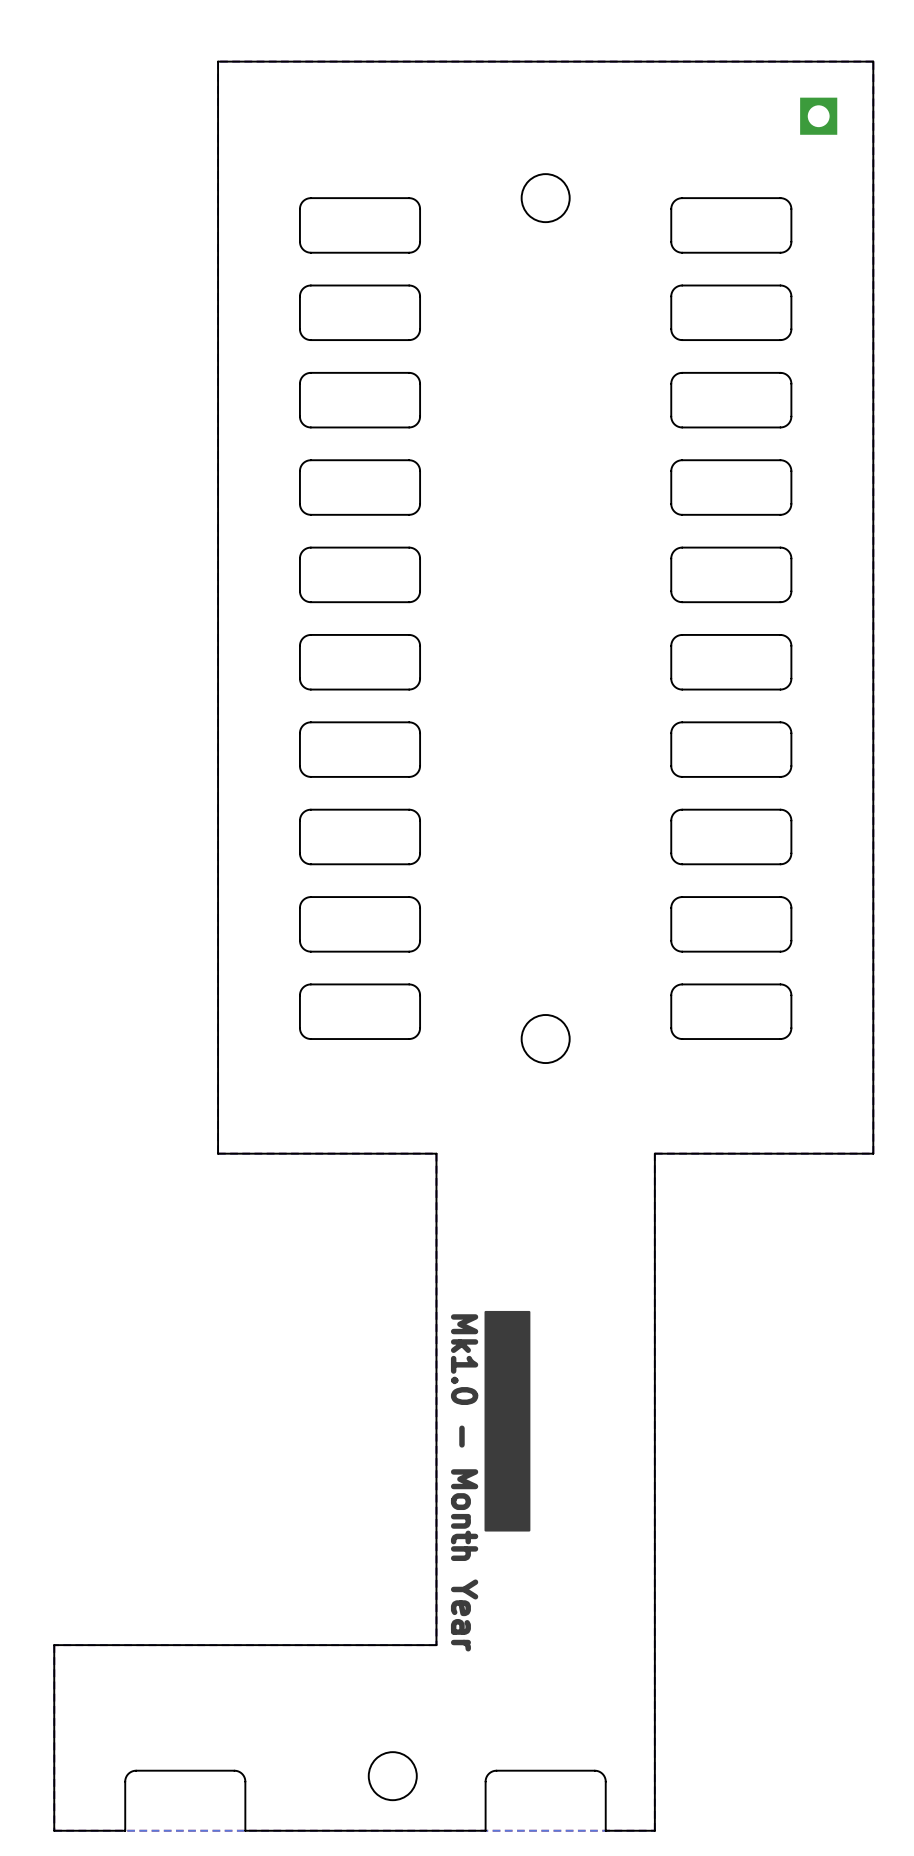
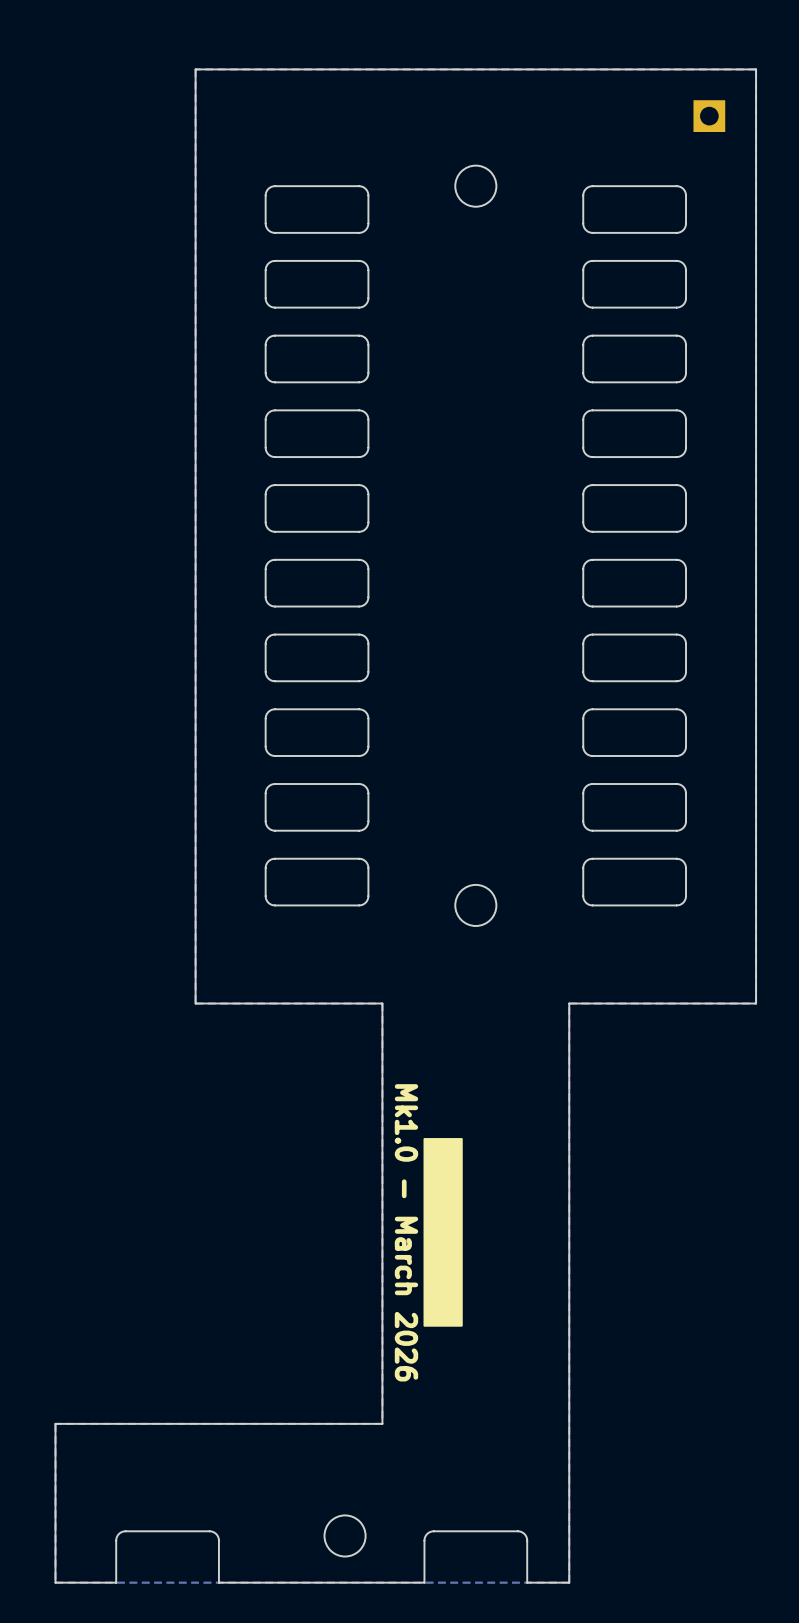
text: Mk1.0 - Month Year (464, 1482) -> Mk1.0 - March 2026 (406, 1232)

